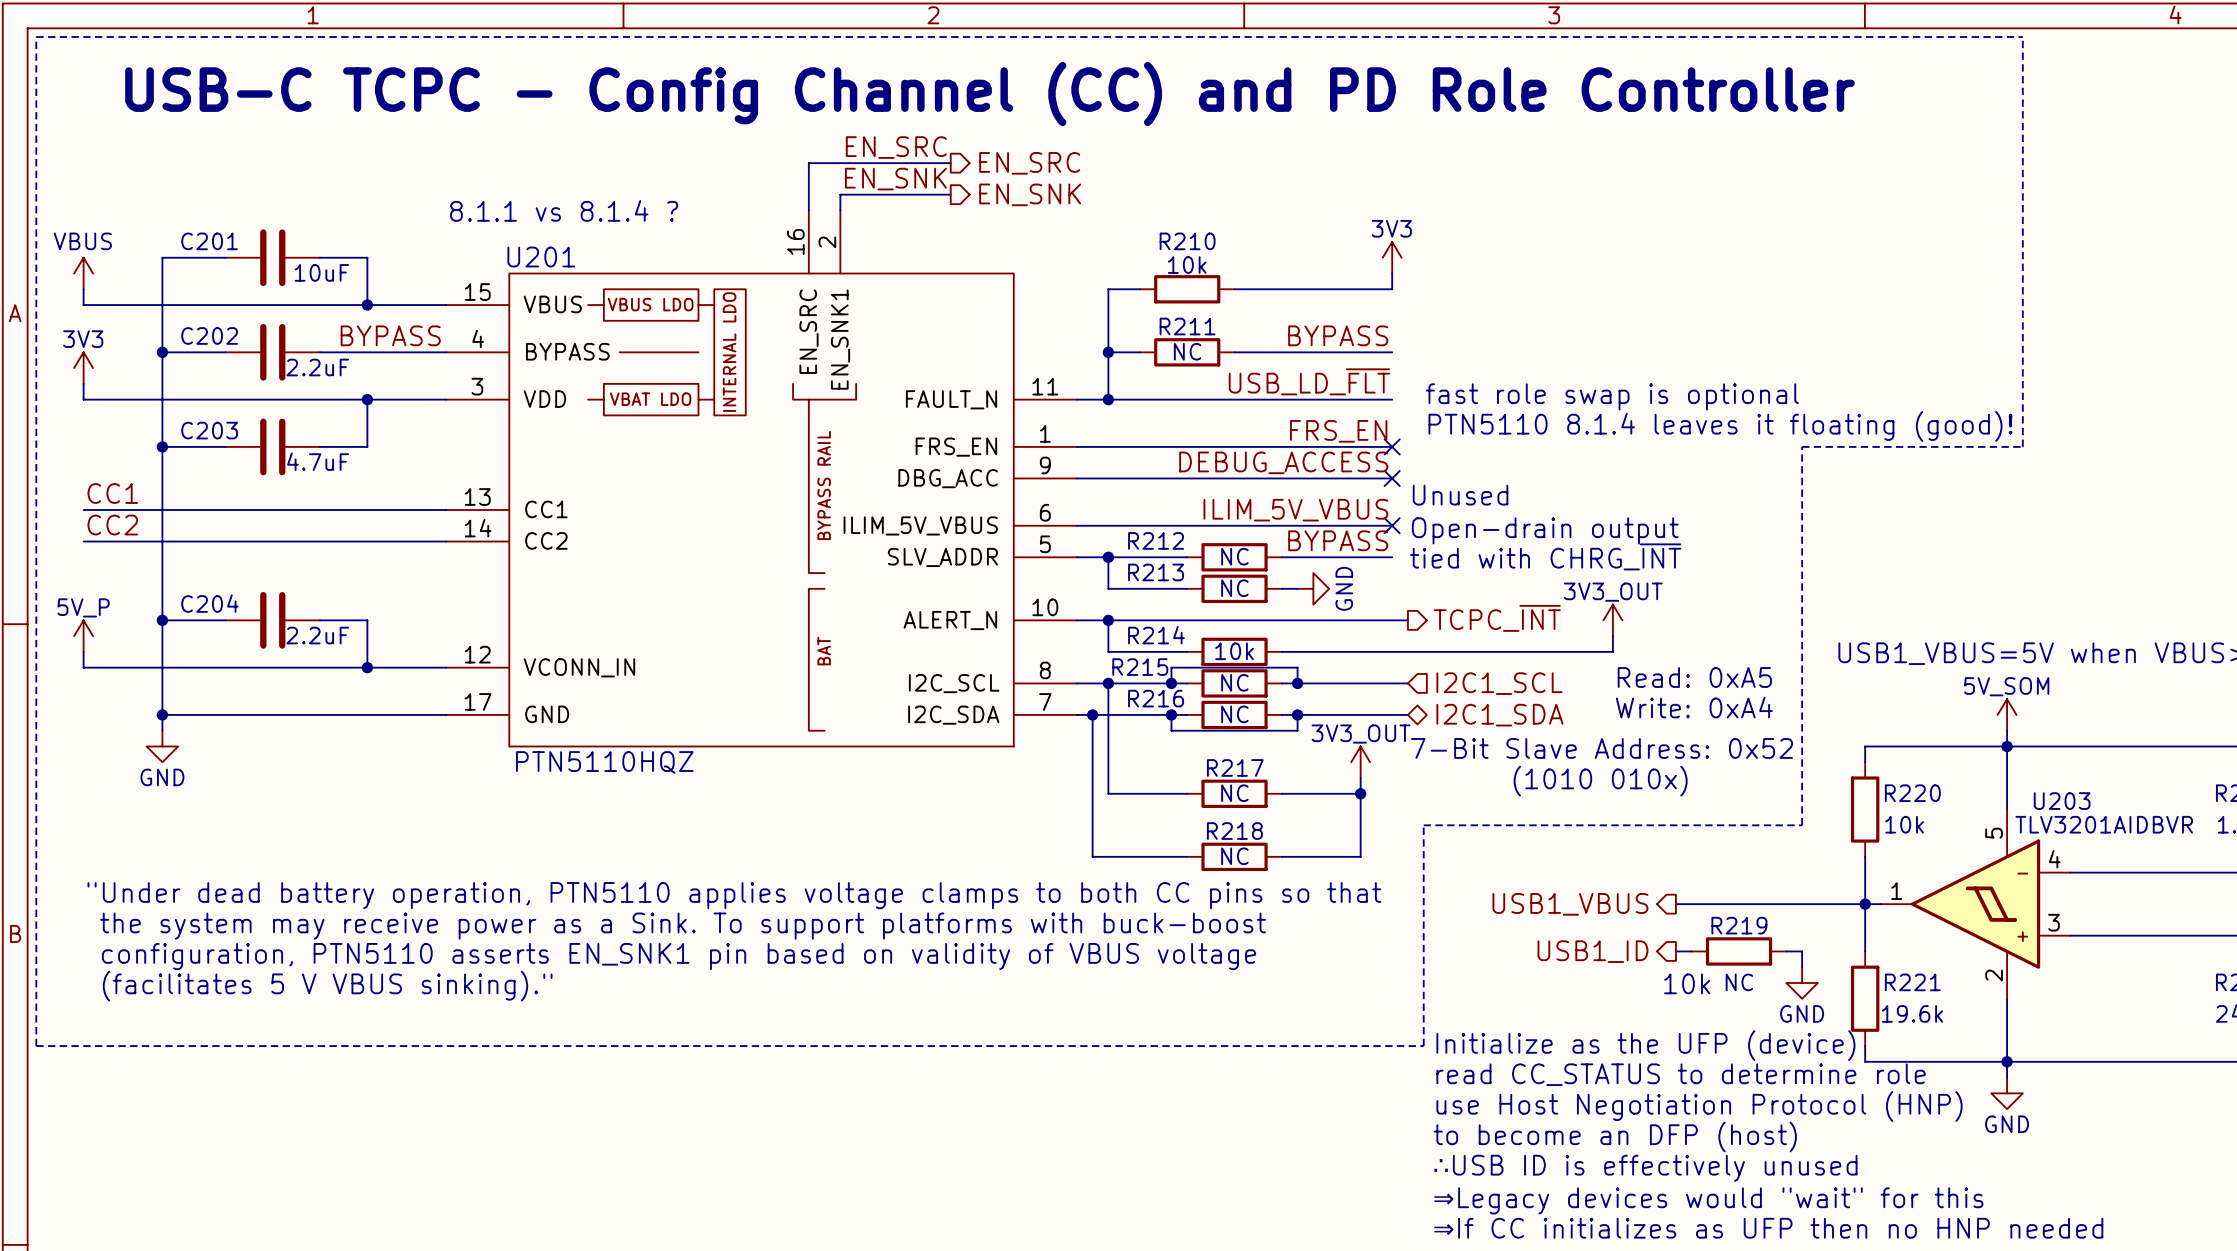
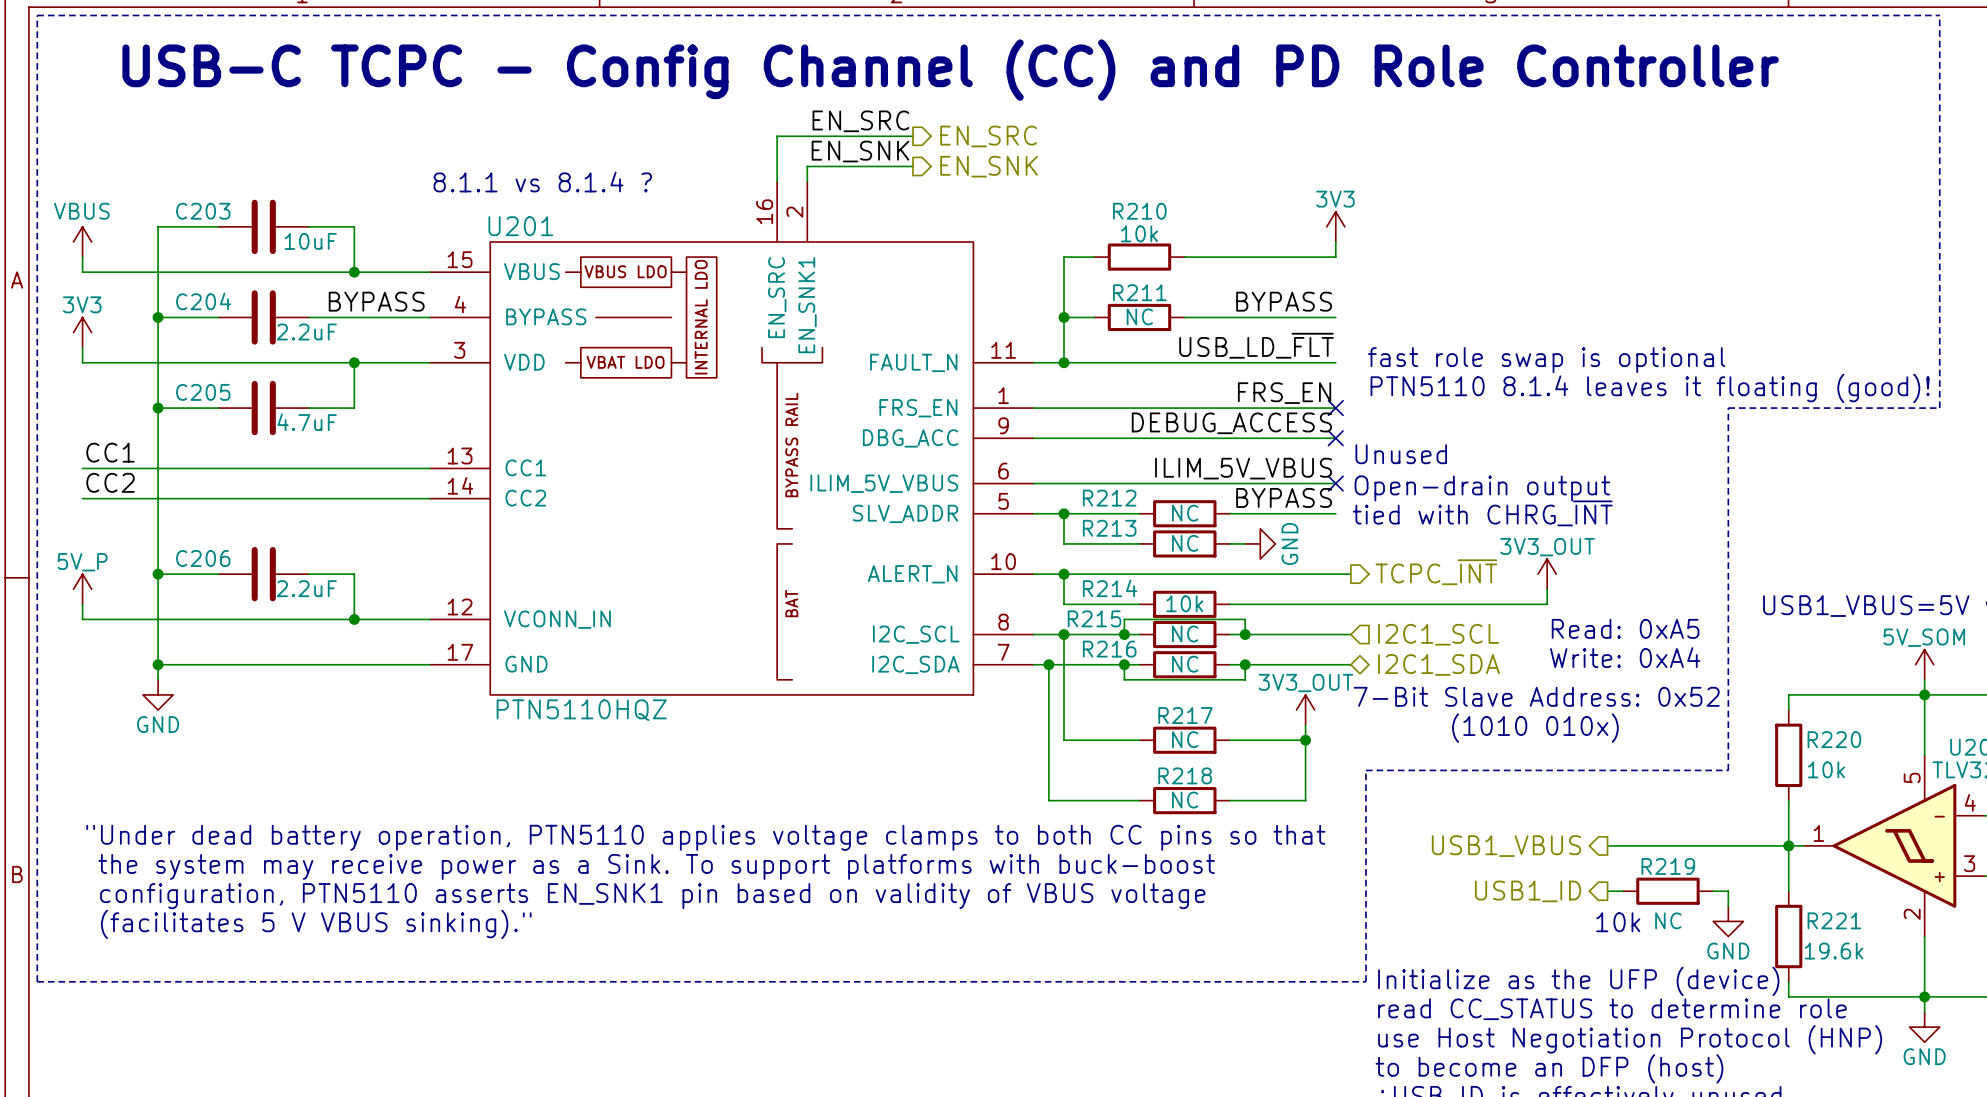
C201 name: C201 (209, 241) -> C203 (203, 211)
C202 name: C202 (209, 335) -> C204 (203, 301)
C203 name: C203 (209, 430) -> C205 (203, 392)
C204 name: C204 (209, 603) -> C206 (203, 558)

